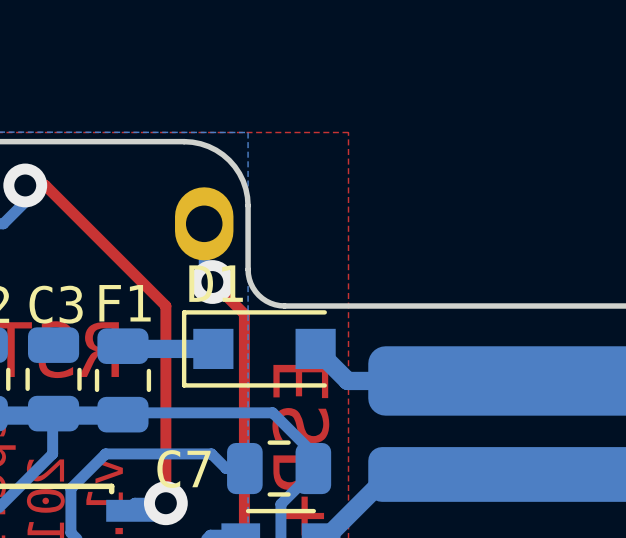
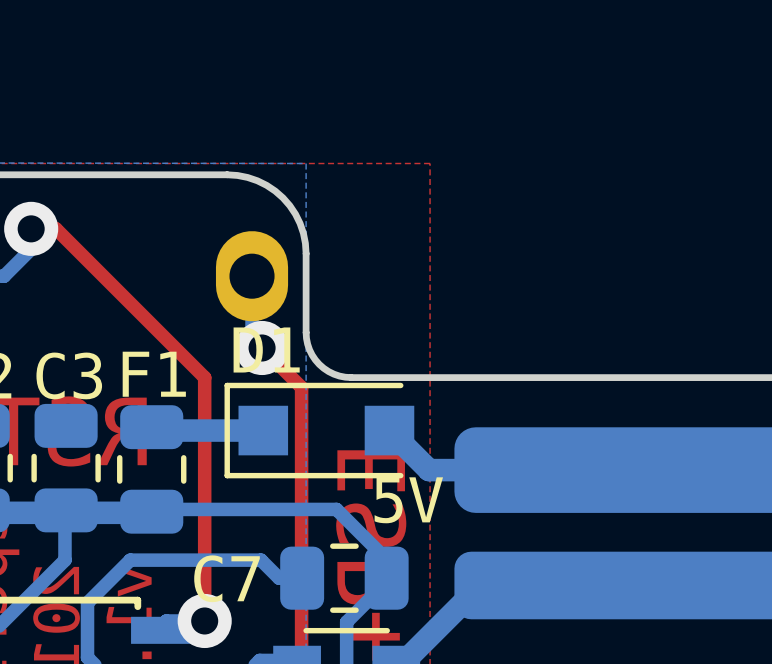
text: none -> 5V (408, 500)

